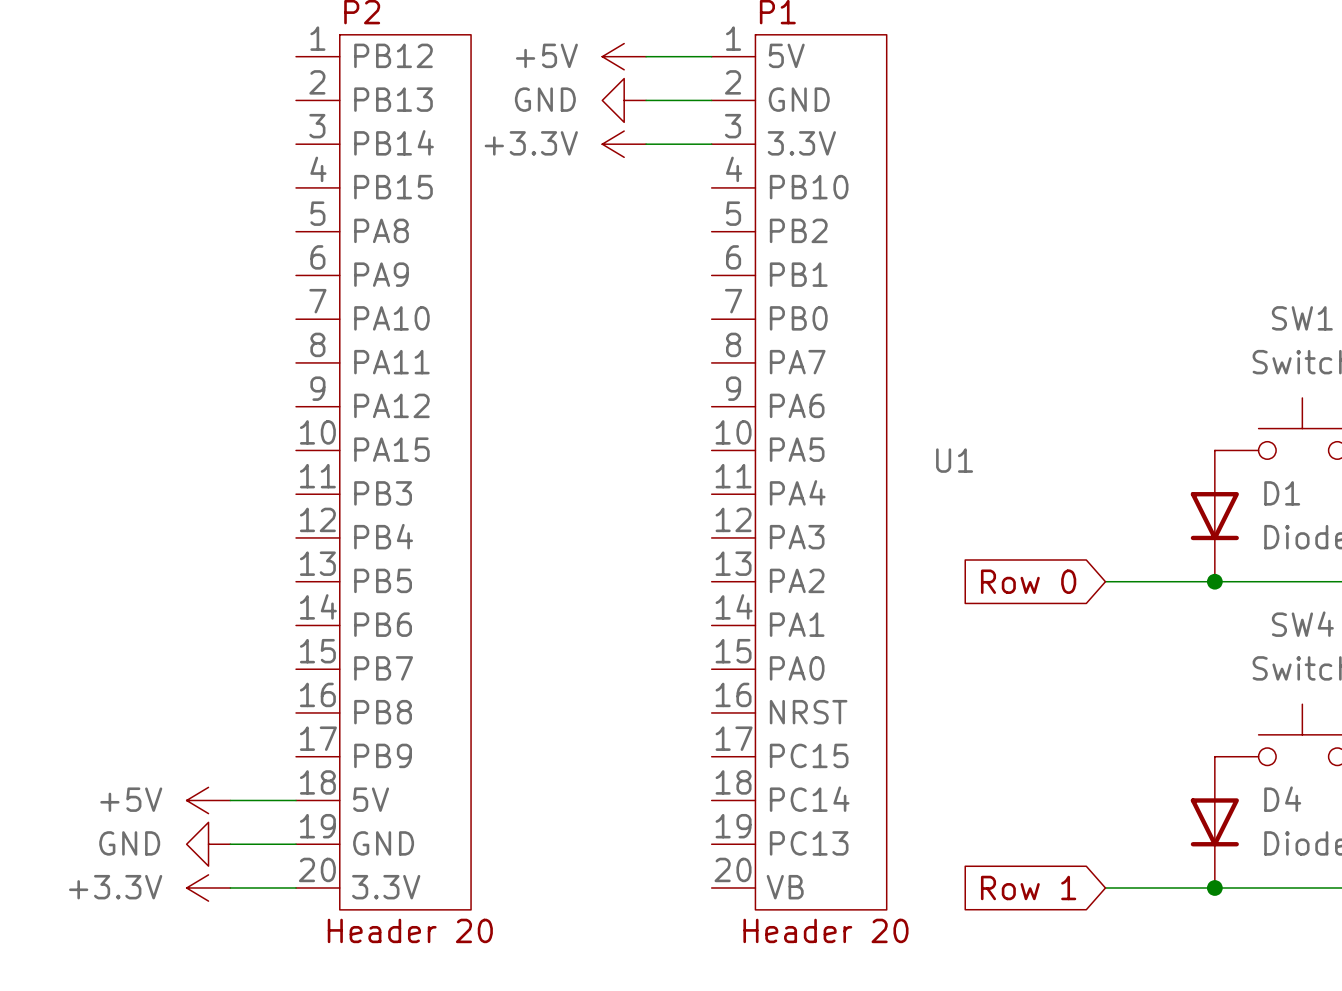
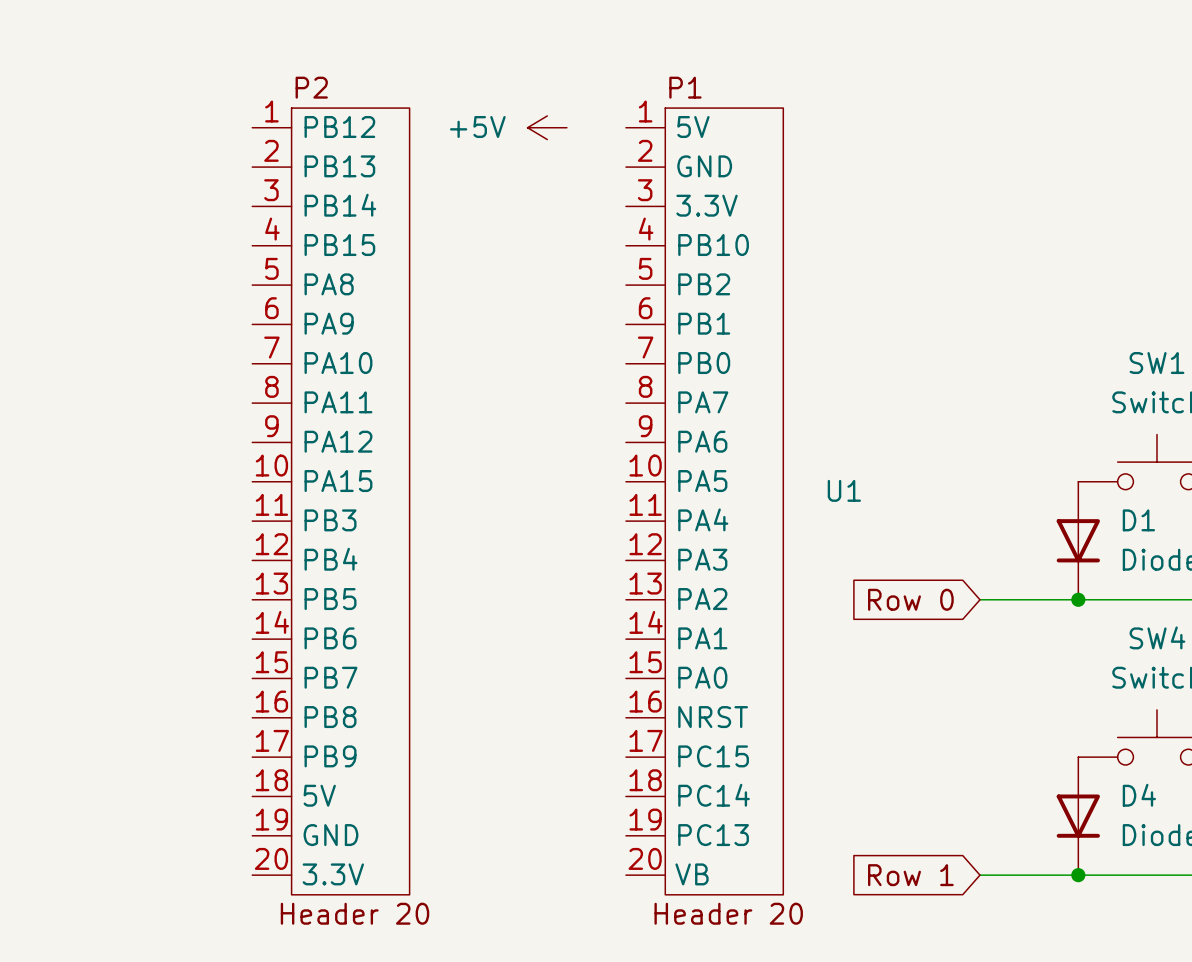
wire: (646, 56) (711, 56) -> none
power symbol: GND (624, 100) -> none
wire: (646, 100) (711, 100) -> none
power symbol: +3.3V (624, 144) -> none
wire: (646, 144) (711, 144) -> none
power symbol: +5V (208, 800) -> none
wire: (230, 800) (296, 800) -> none
power symbol: GND (208, 844) -> none
wire: (230, 844) (296, 844) -> none
power symbol: +3.3V (208, 887) -> none
wire: (230, 887) (296, 887) -> none

